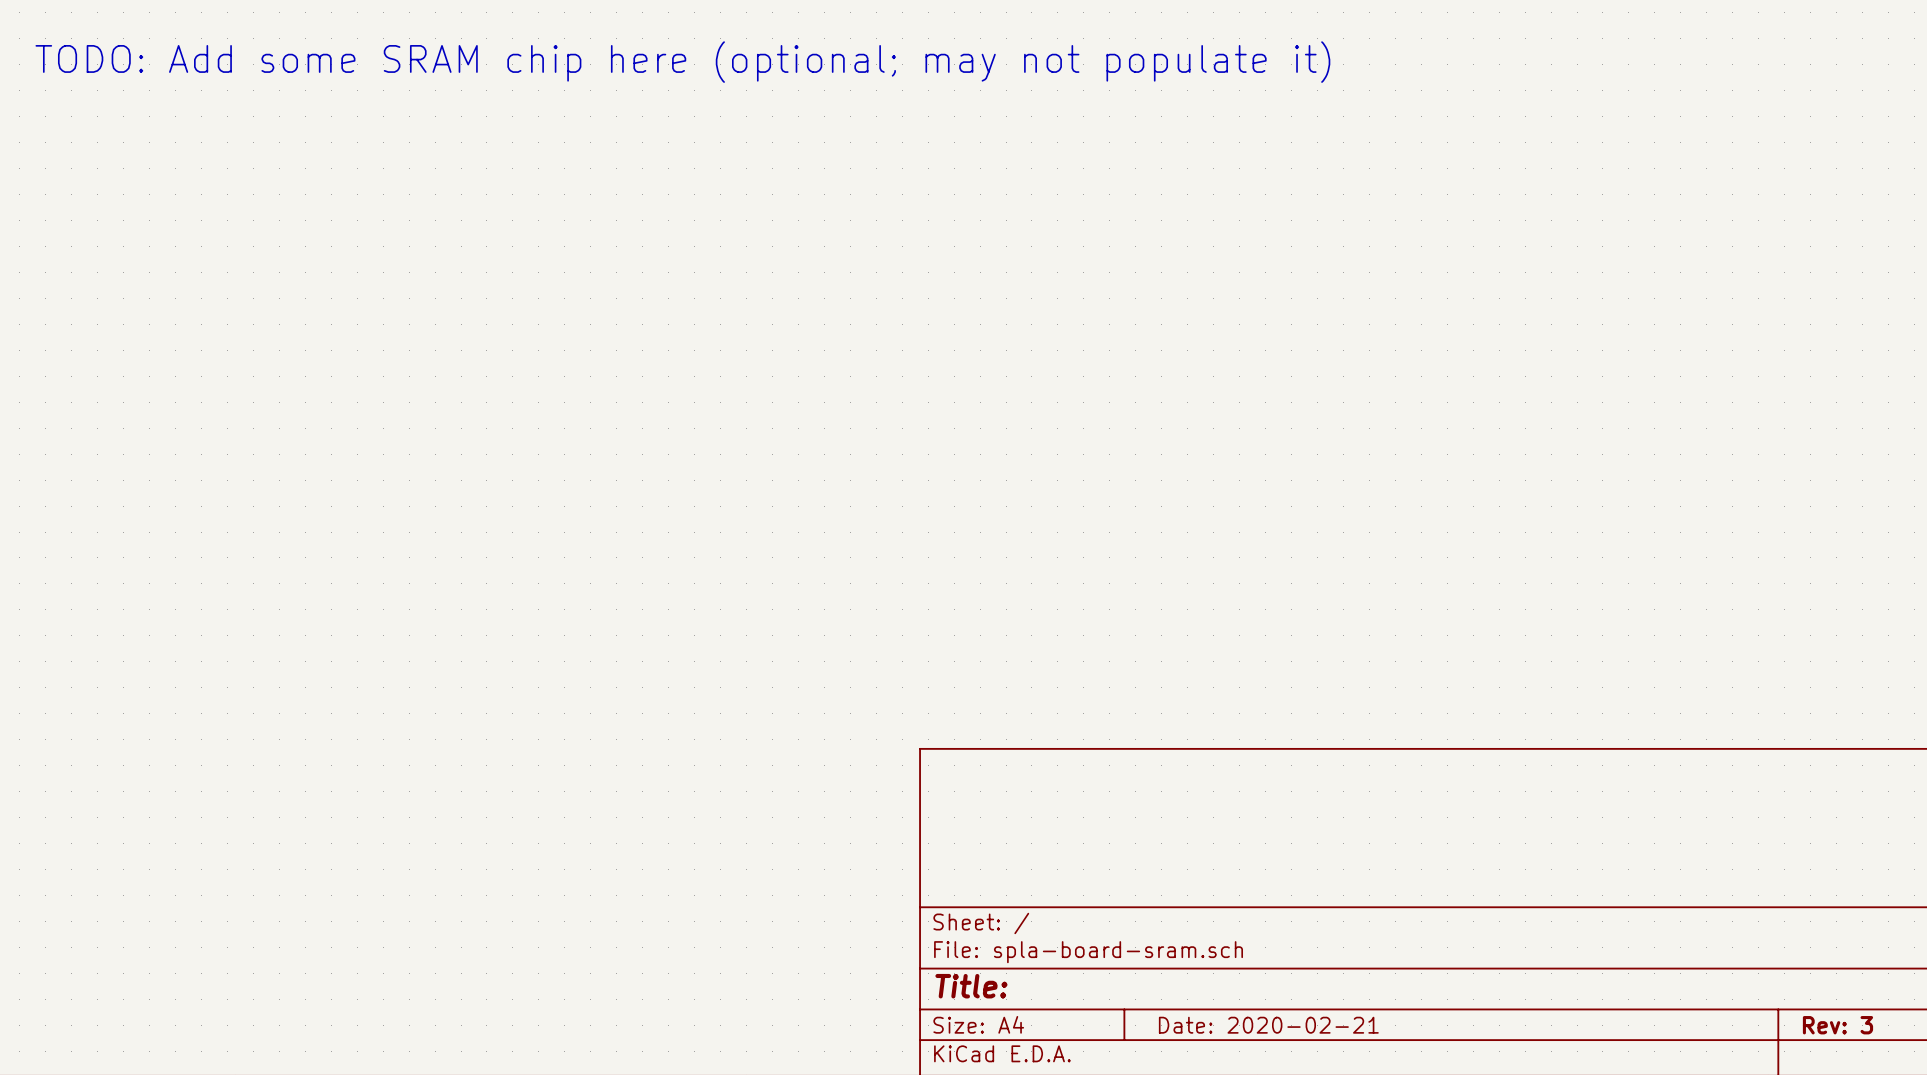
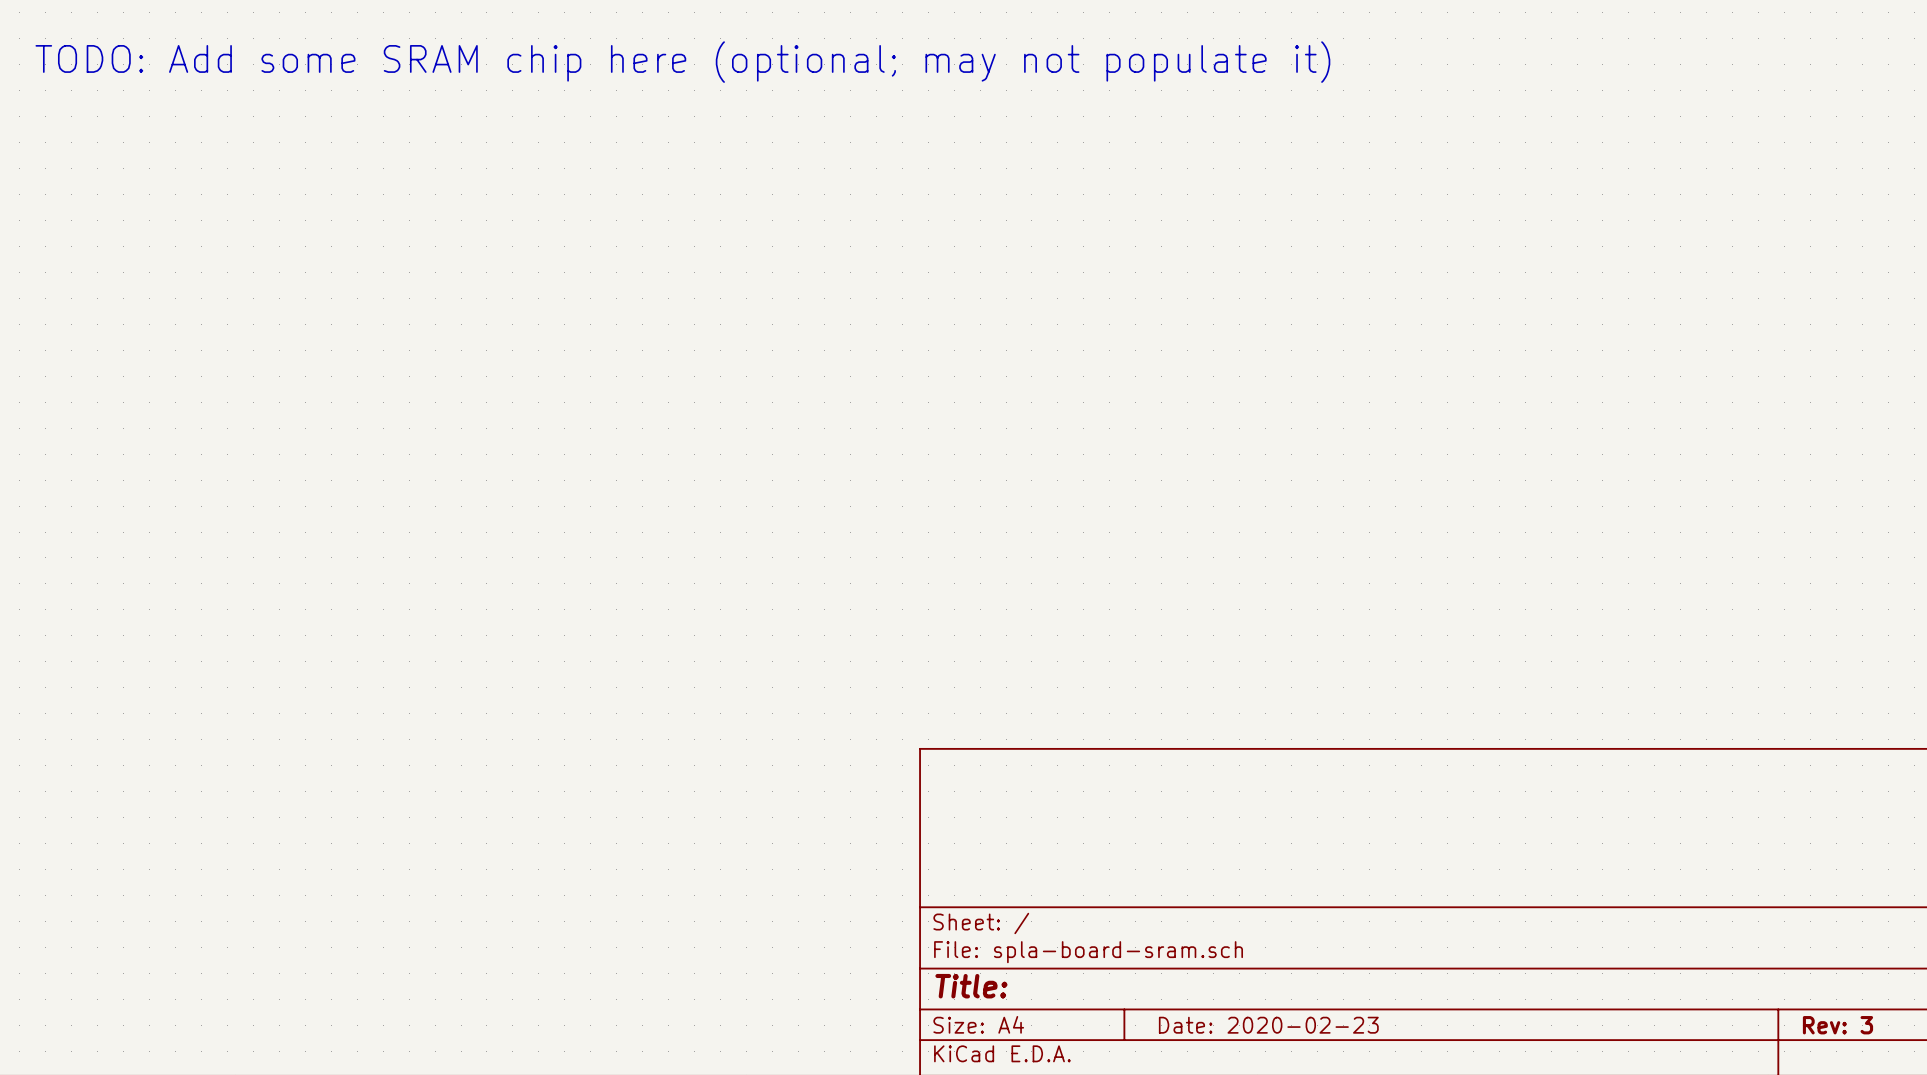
title block: Date: 2020-02-21 (1268, 1025) -> Date: 2020-02-23 (1268, 1025)

